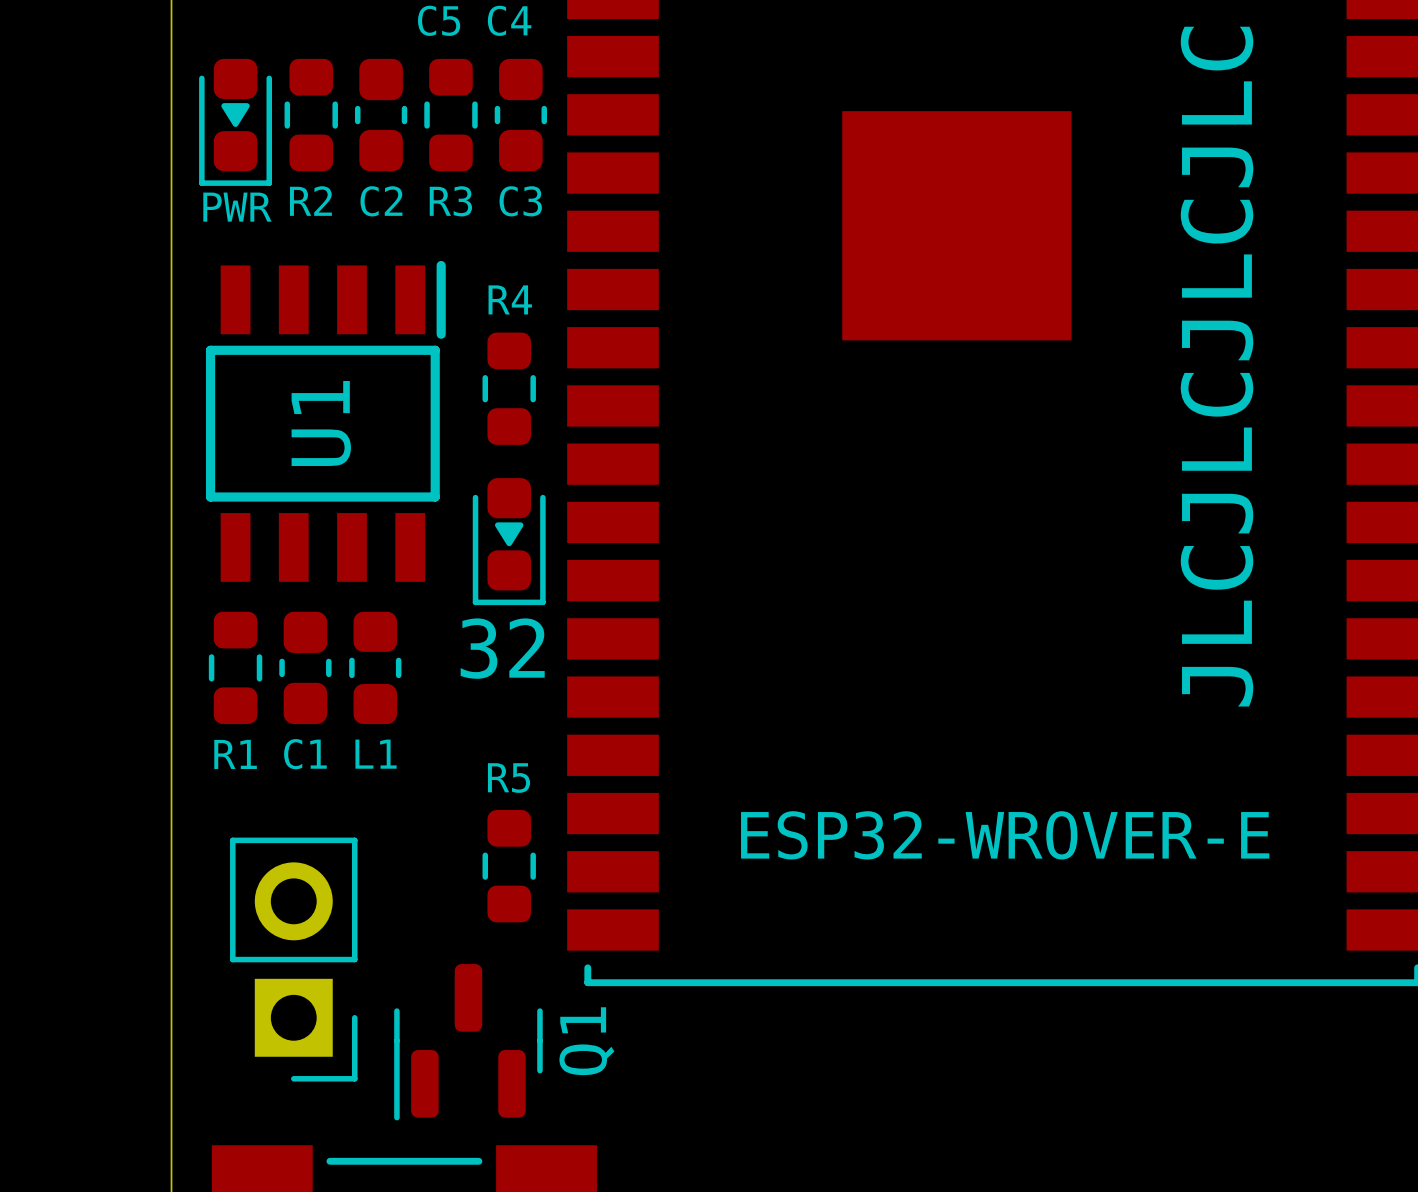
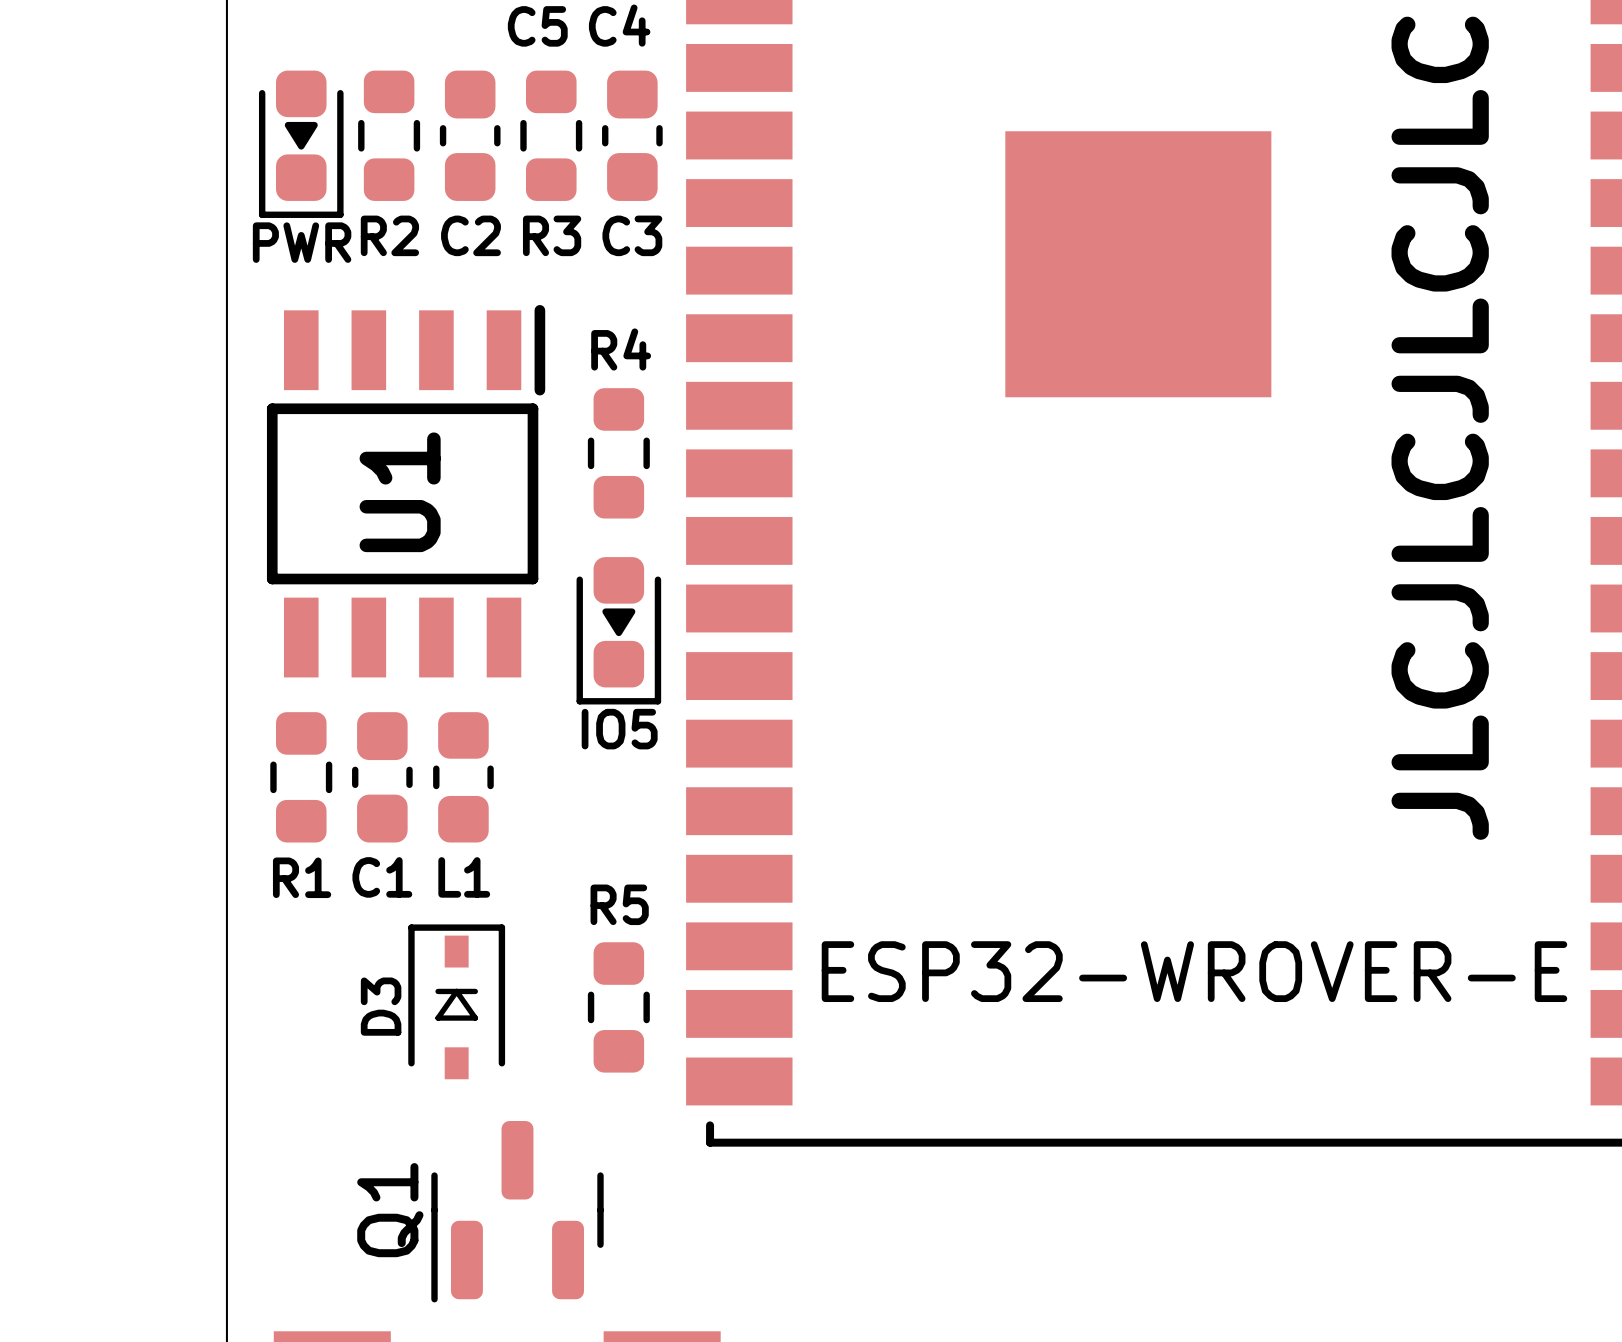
part value: 32 (502, 648) -> IO5 (619, 729)
D3: none -> (456, 1001)
part: (293, 959) -> none
Q1 name position: Q1 (586, 1041) -> Q1 (390, 1210)
Q1 position: (468, 1042) -> (517, 1211)

